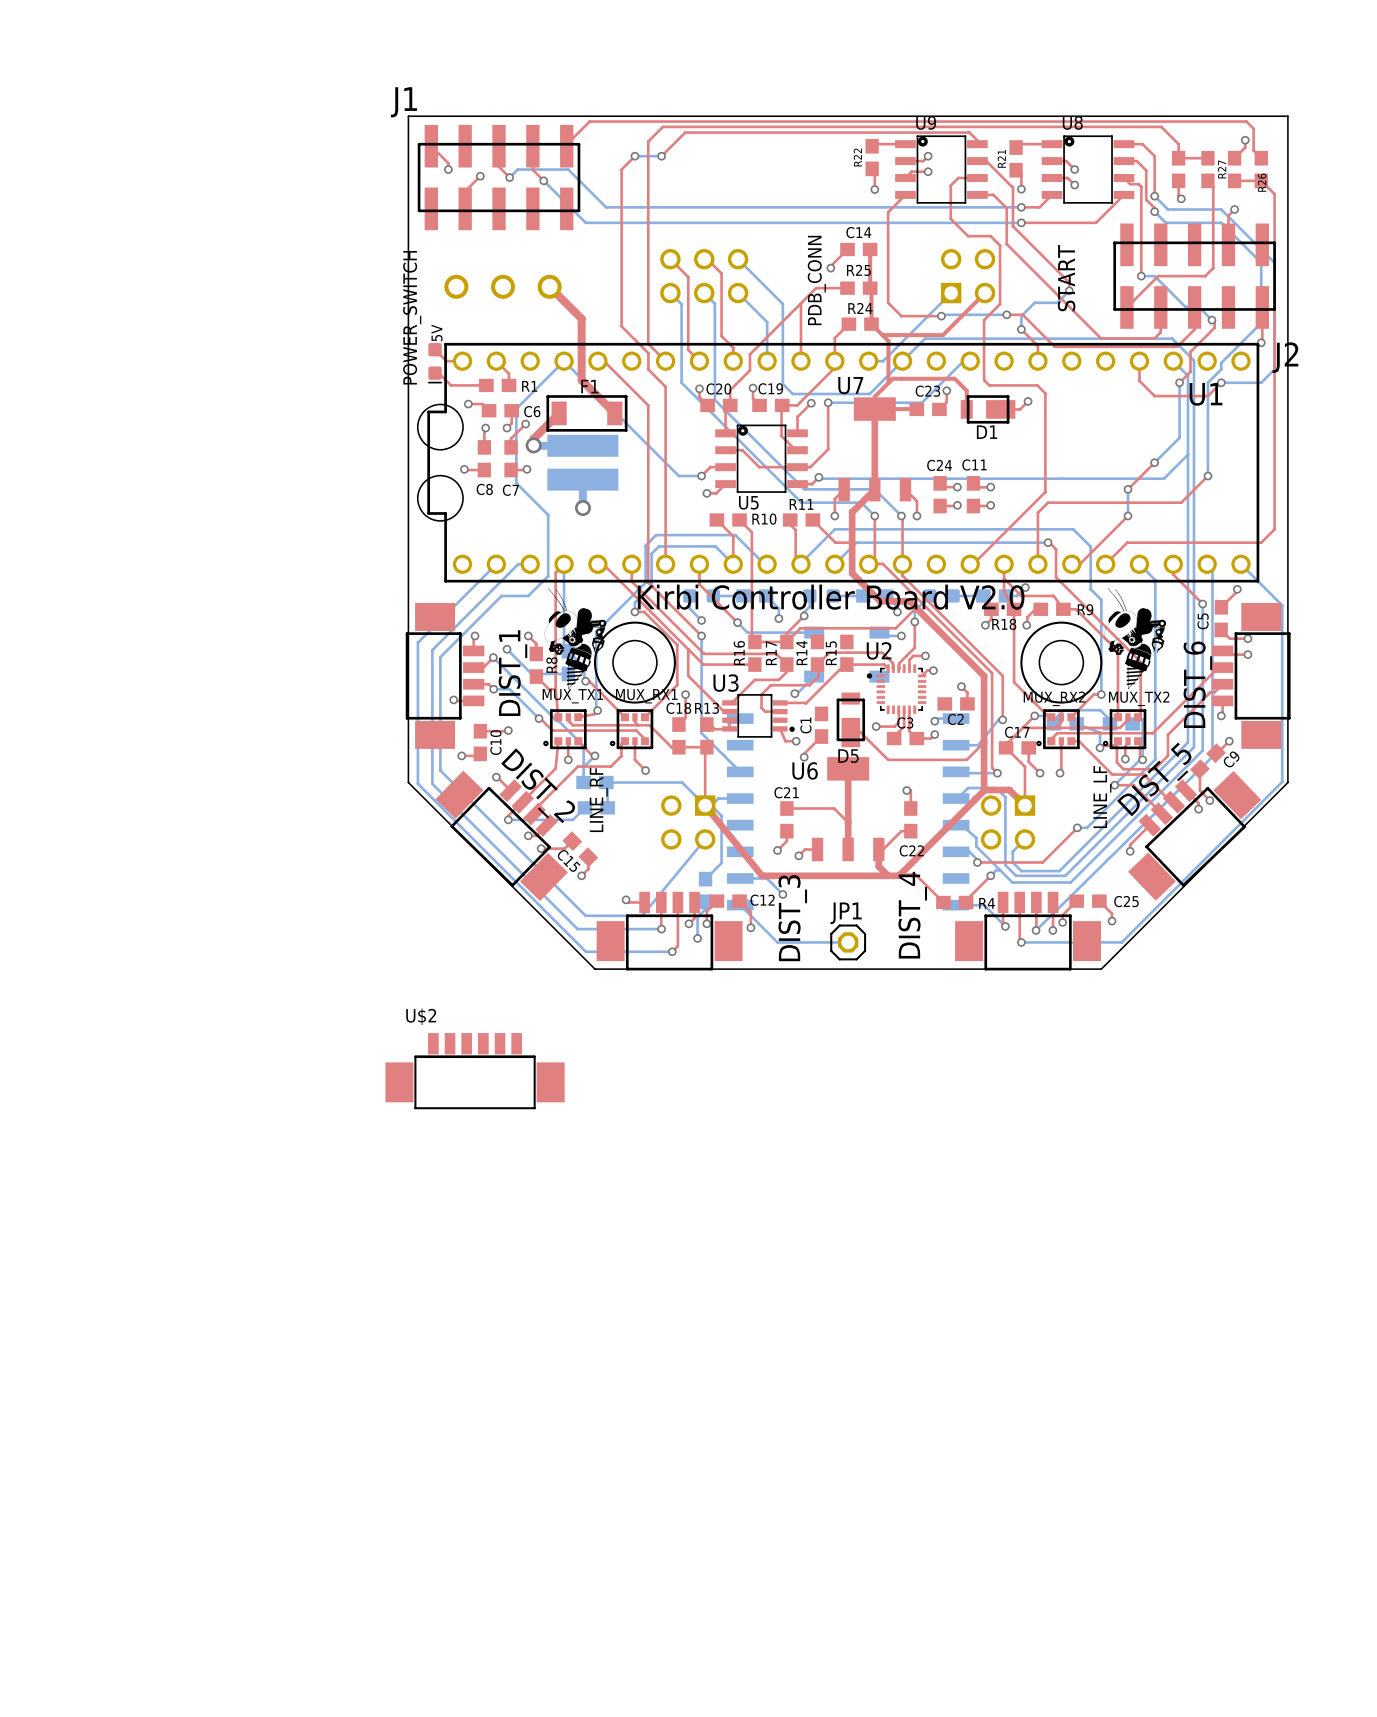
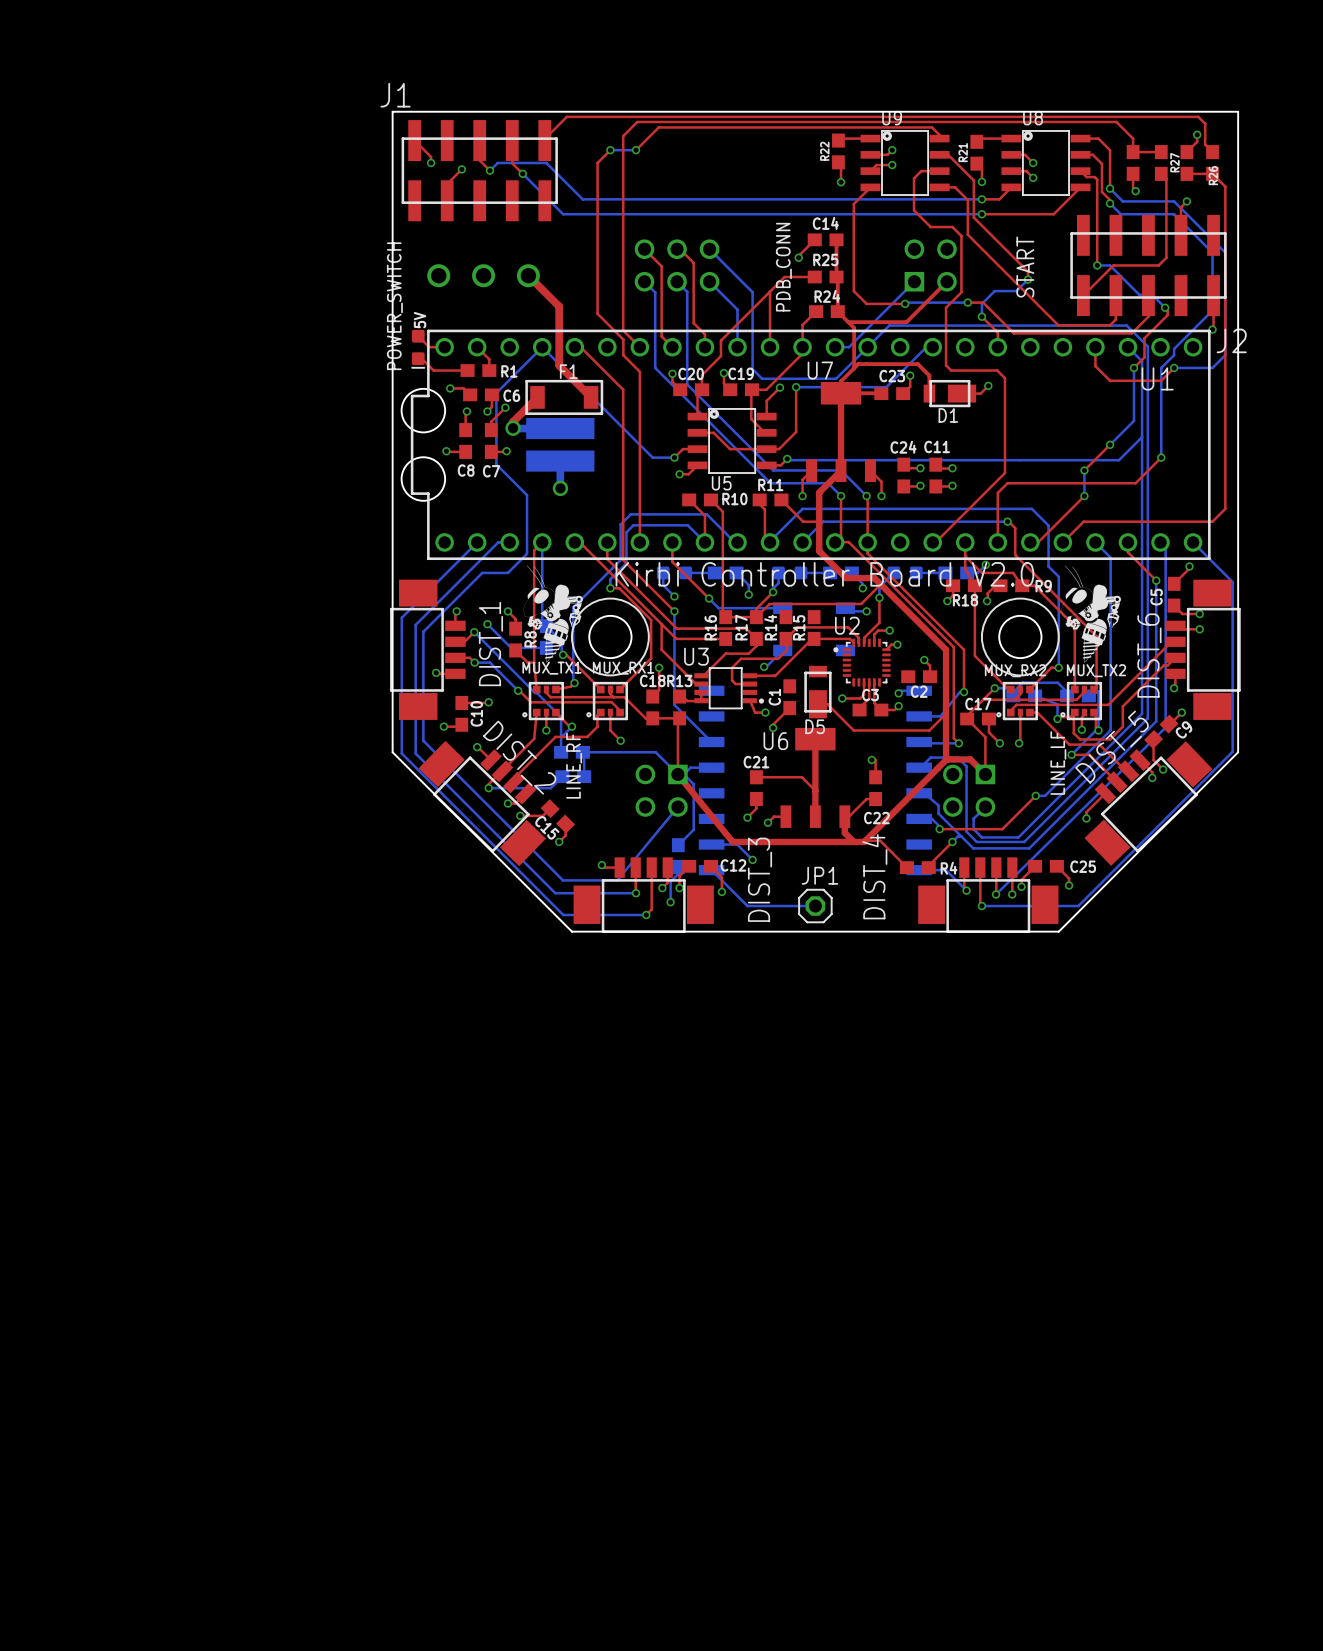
U$2: (475, 1071) -> none

